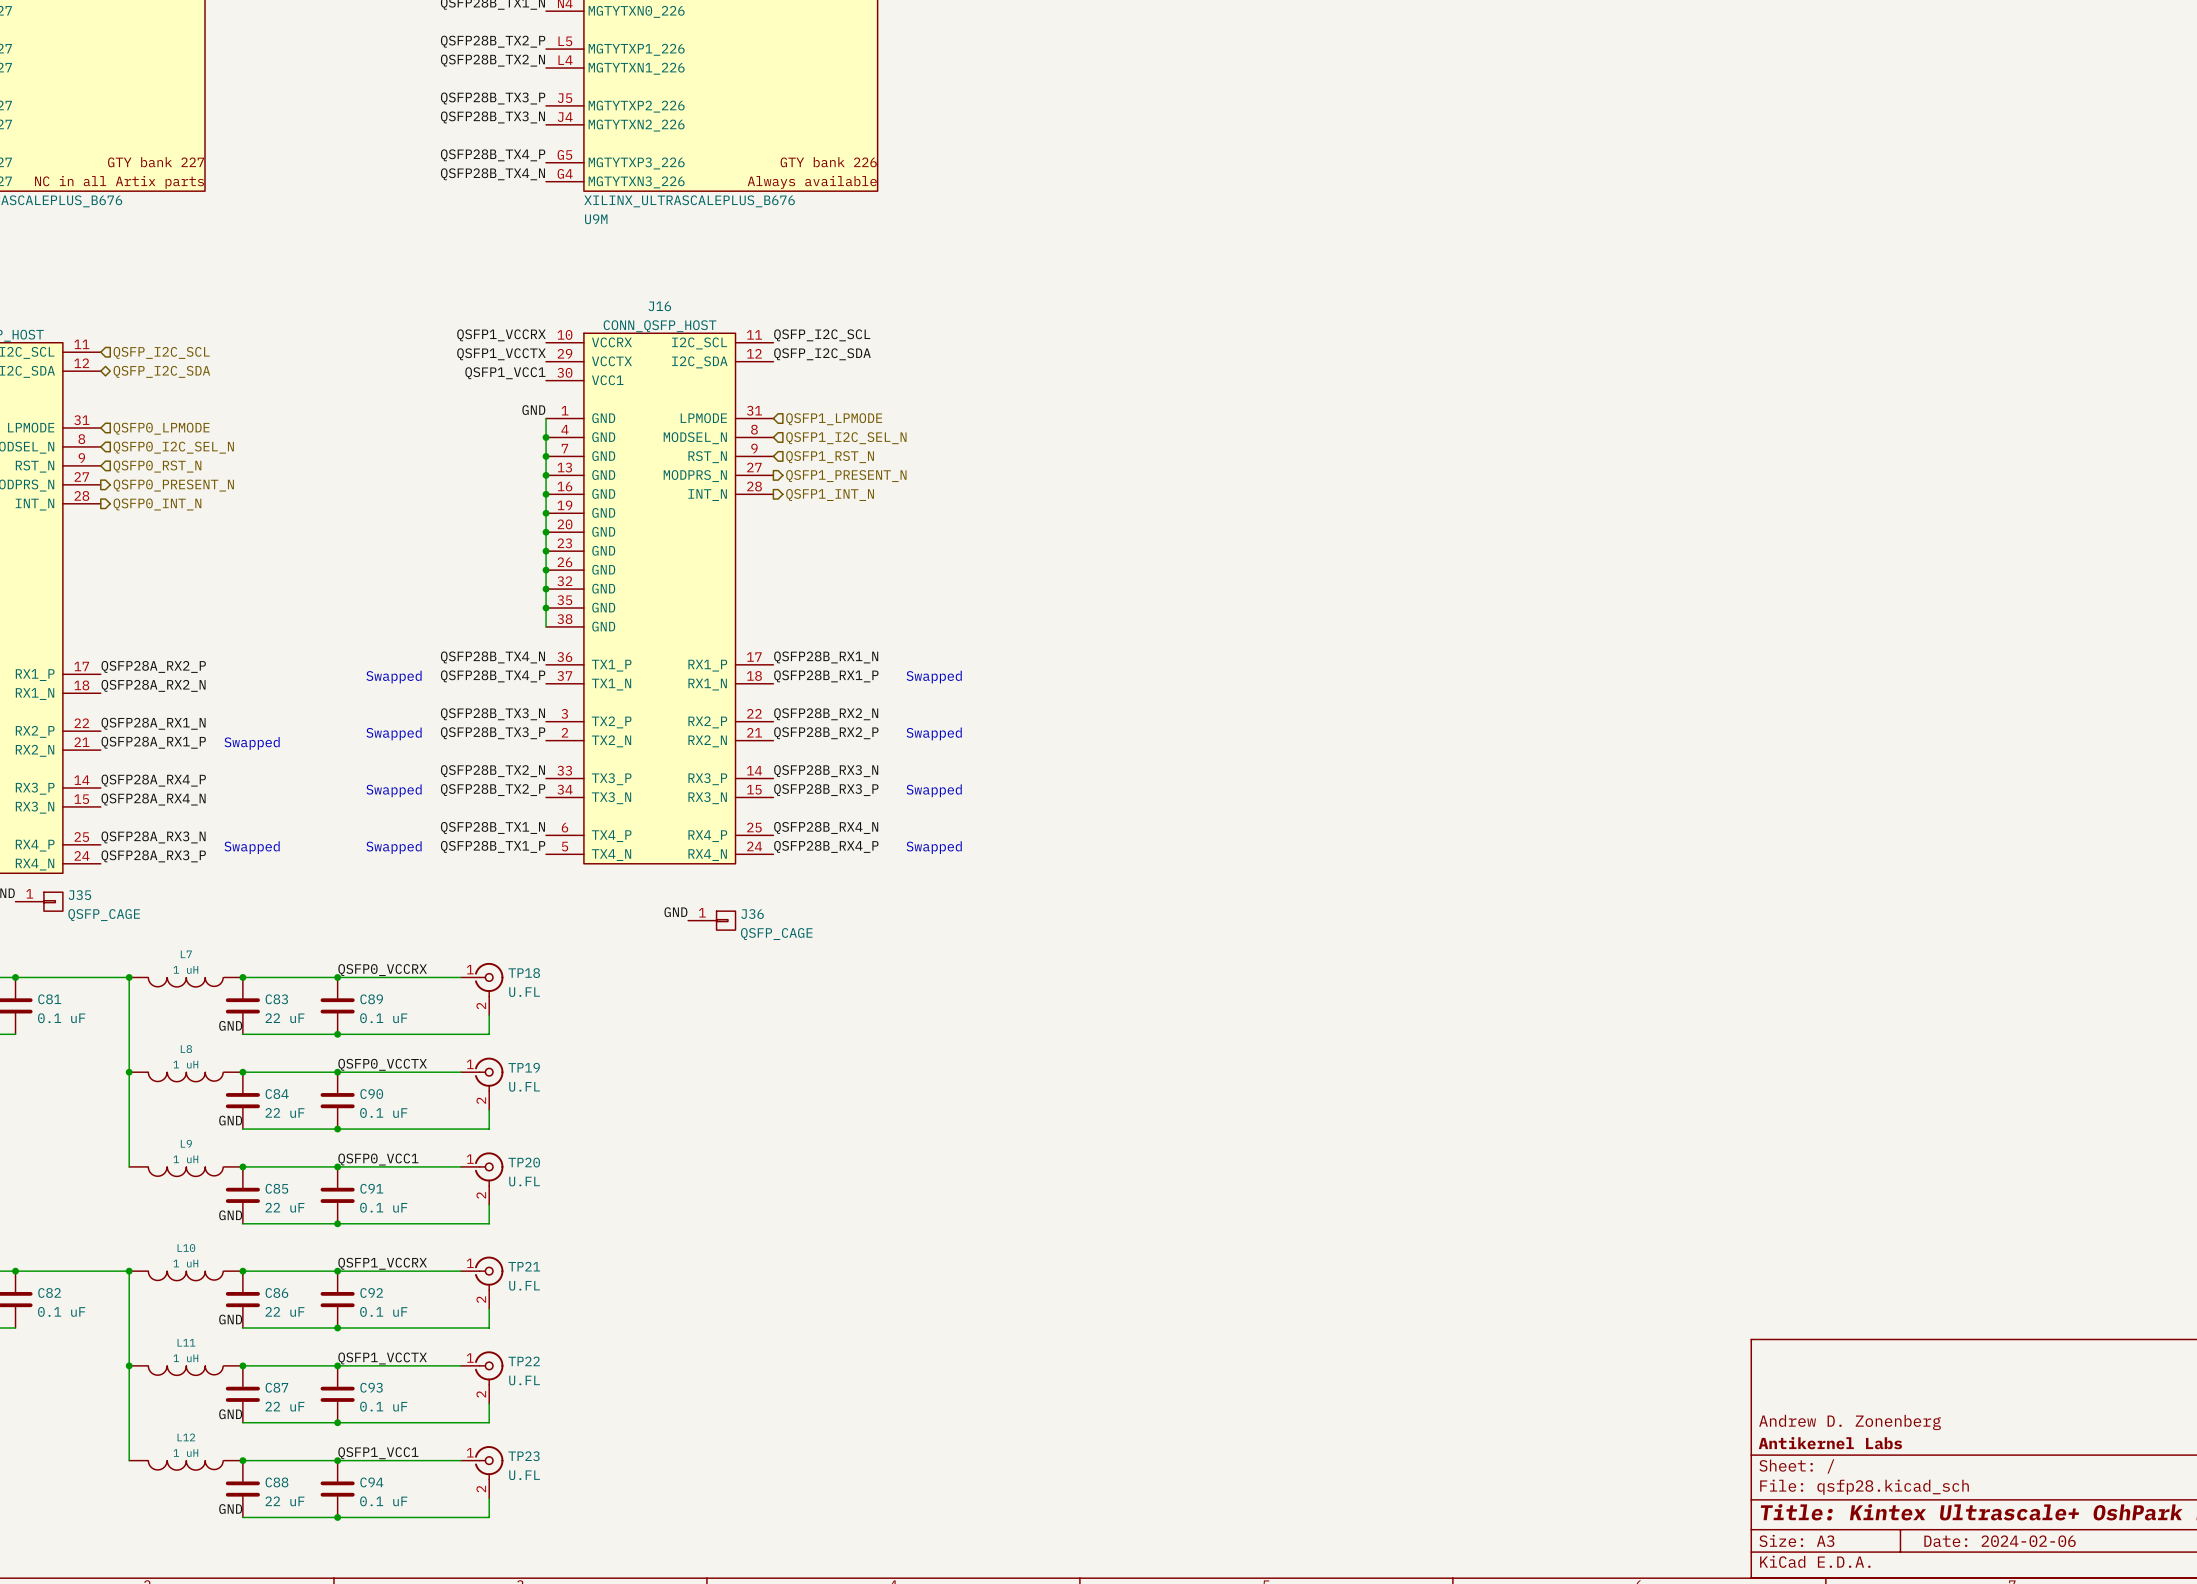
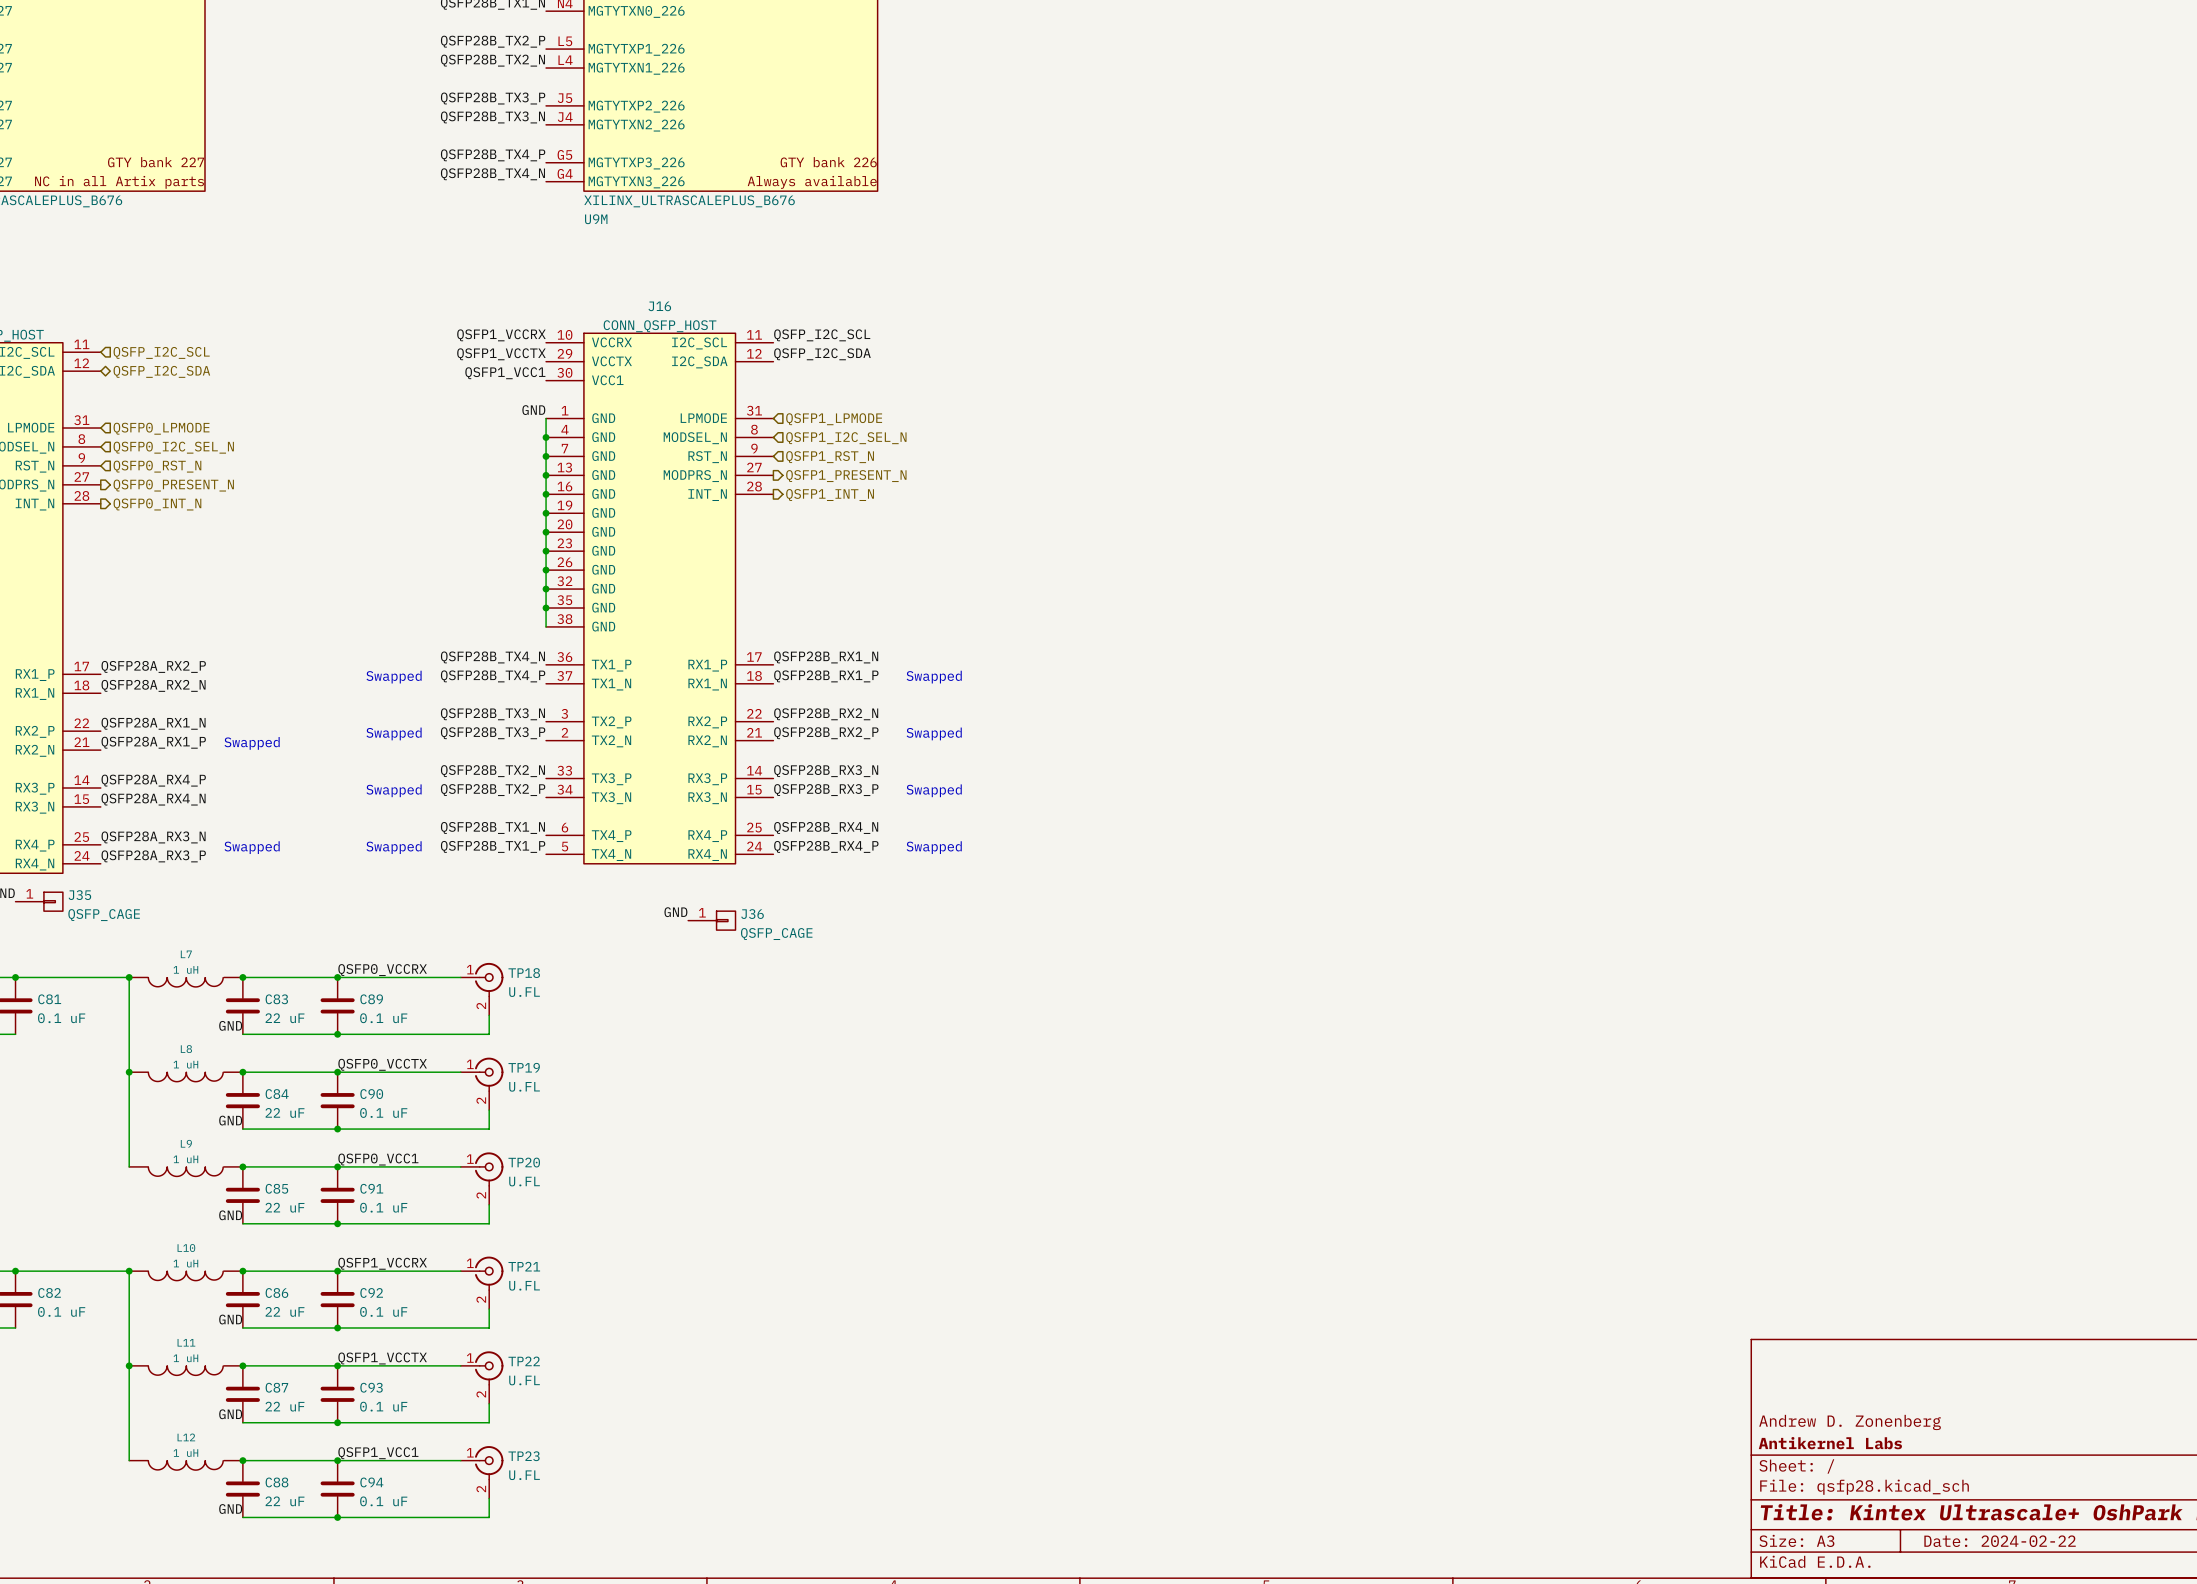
title block: Date: 2024-02-06 (2000, 1541) -> Date: 2024-02-22 (2000, 1541)

